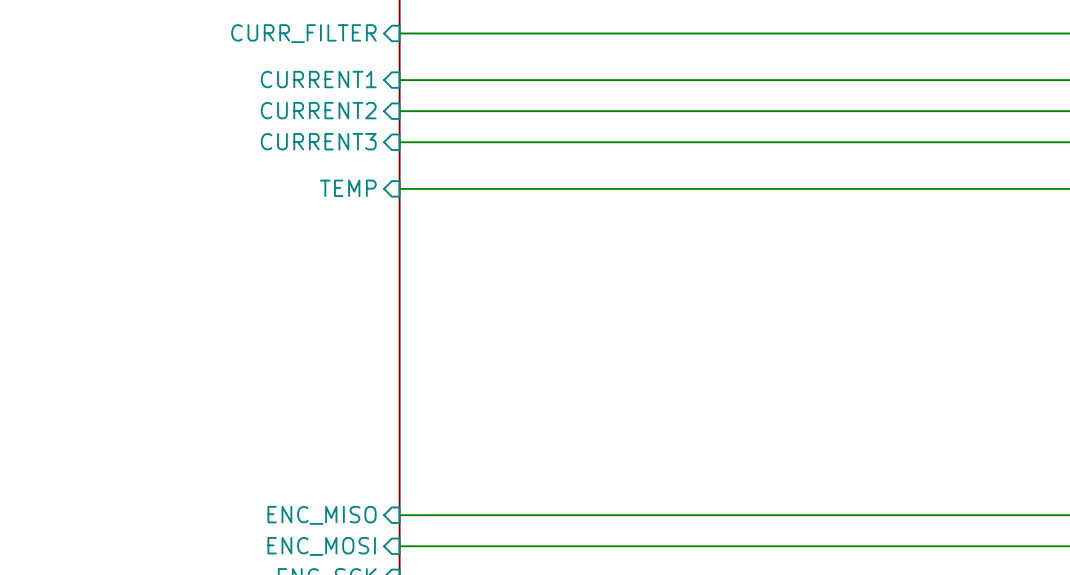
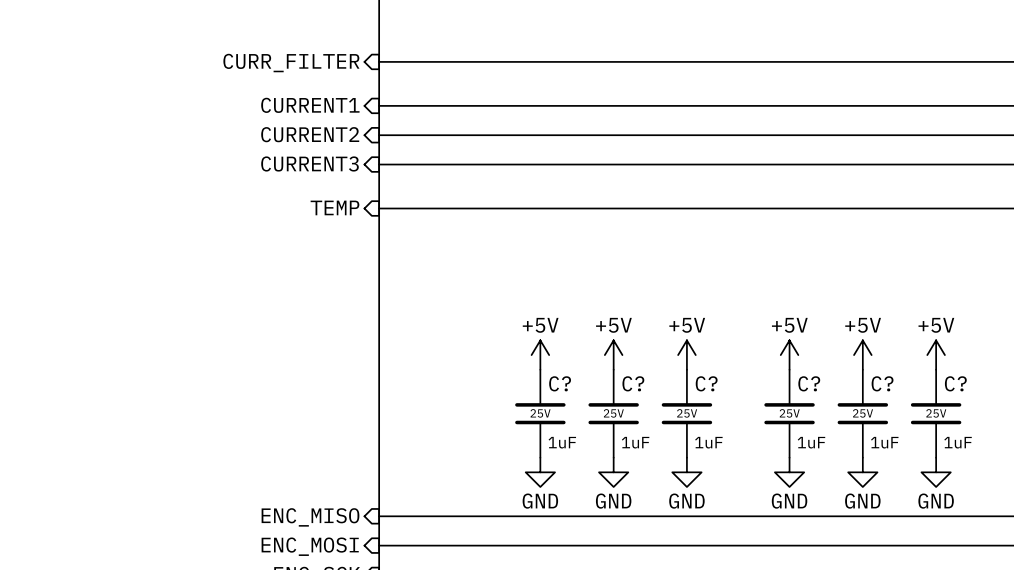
power symbol: none -> +5V (540, 355)
power symbol: none -> +5V (613, 355)
power symbol: none -> +5V (686, 355)
power symbol: none -> +5V (789, 355)
power symbol: none -> +5V (862, 355)
power symbol: none -> +5V (936, 355)
C?: none -> 1uF (540, 413)
C?: none -> 1uF (613, 413)
C?: none -> 1uF (686, 413)
C?: none -> 1uF (789, 413)
C?: none -> 1uF (862, 413)
C?: none -> 1uF (936, 413)
power symbol: none -> GND (540, 472)
power symbol: none -> GND (613, 472)
power symbol: none -> GND (686, 472)
power symbol: none -> GND (789, 472)
power symbol: none -> GND (862, 472)
power symbol: none -> GND (936, 472)

